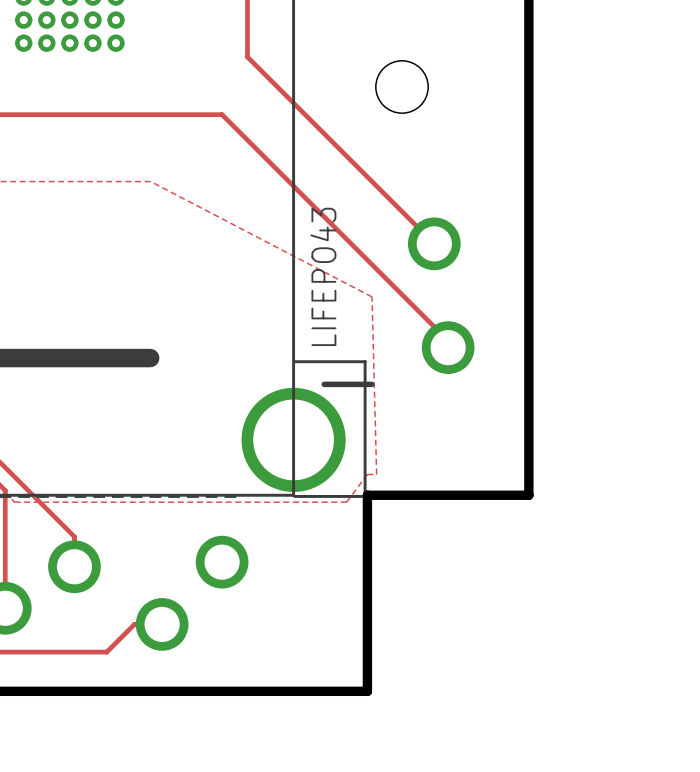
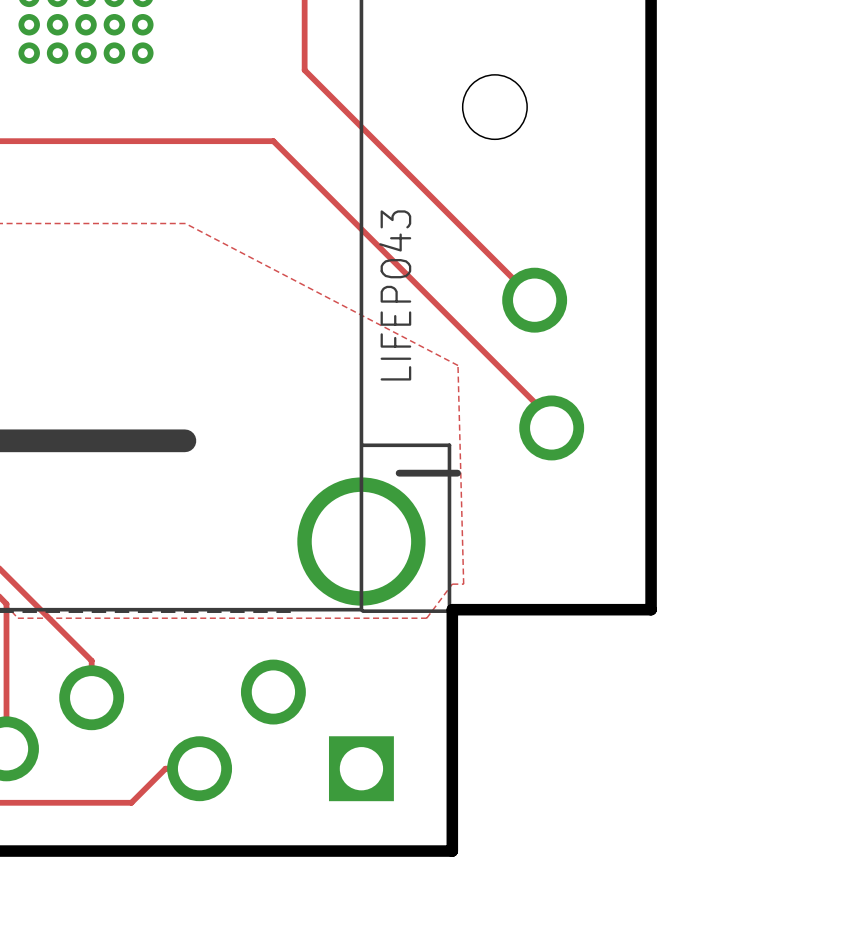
LIFEPO43 name position: LIFEPO43 (323, 276) -> LIFEPO43 (395, 295)
part: none -> (361, 768)

